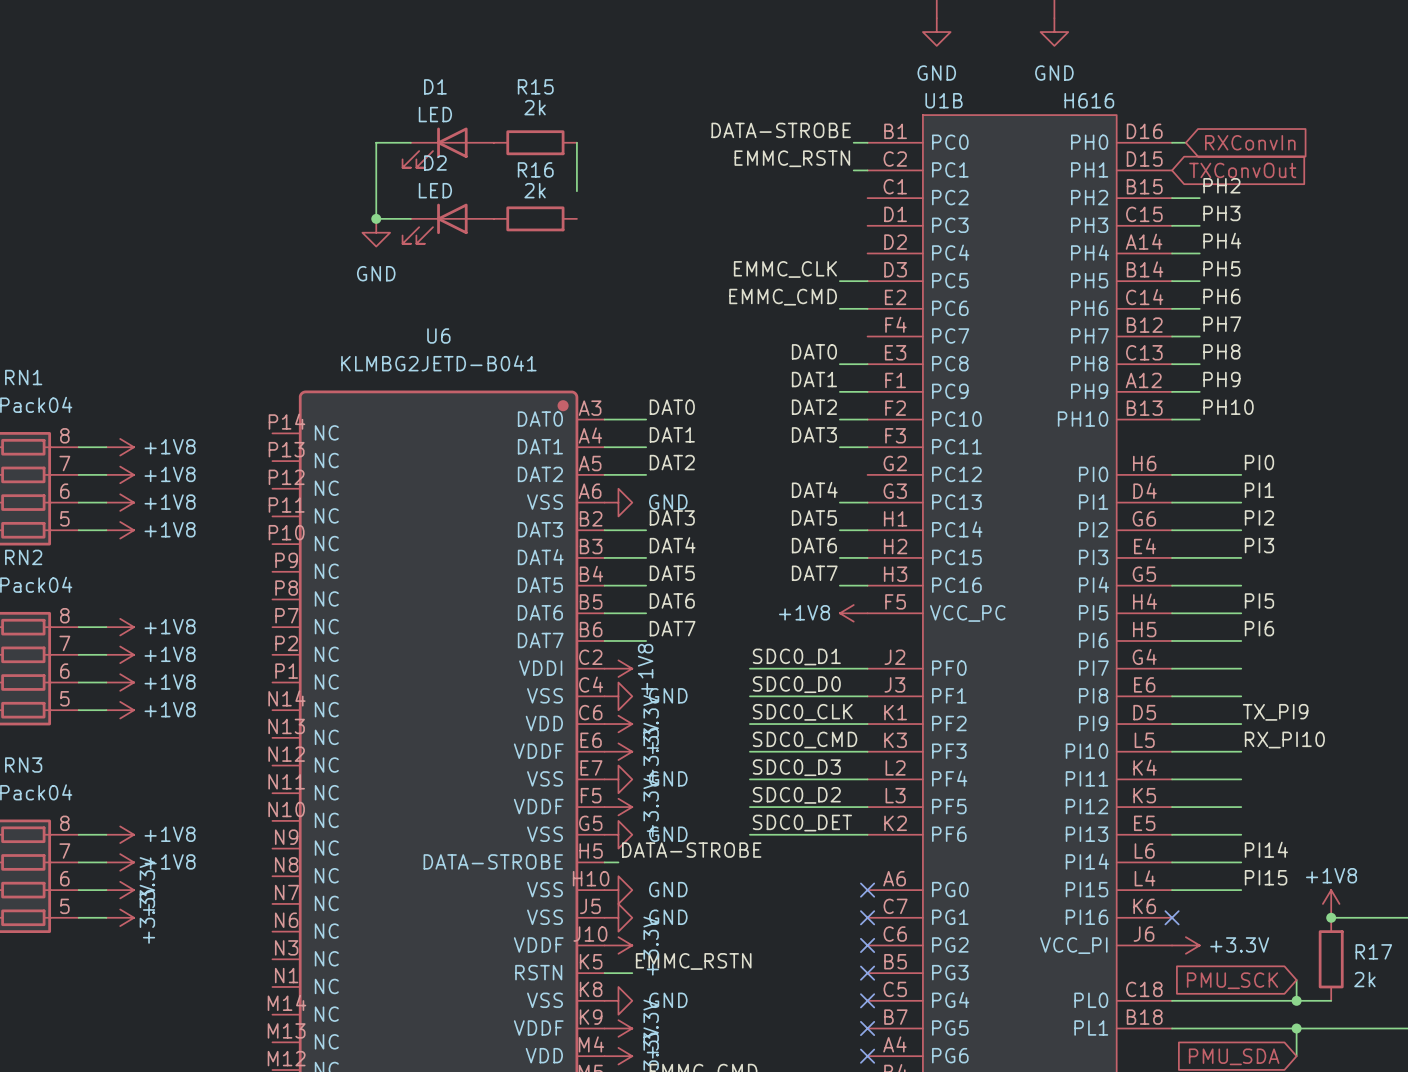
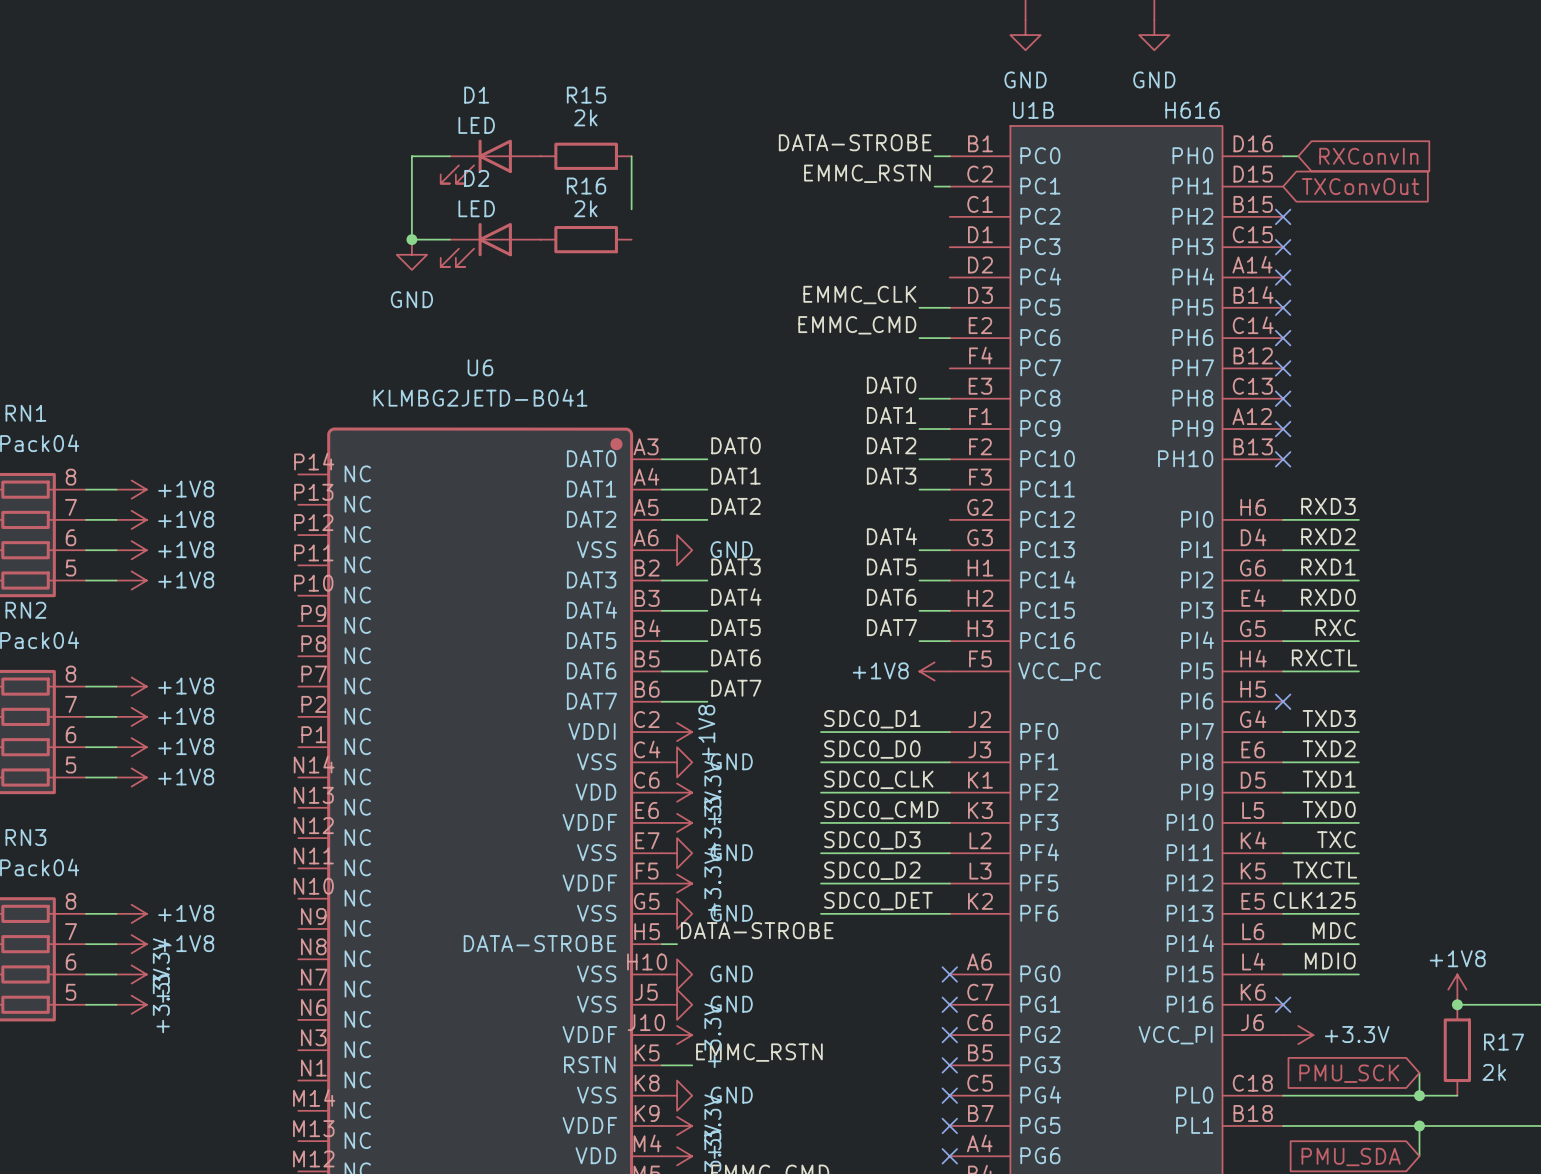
label: PH2 (1221, 185) -> none
wire: (1172, 198) (1199, 198) -> none
no-connect mark: none -> (1283, 216)
label: PH3 (1221, 213) -> none
wire: (1172, 225) (1199, 225) -> none
no-connect mark: none -> (1283, 247)
label: PH4 (1222, 240) -> none
wire: (1172, 253) (1199, 253) -> none
no-connect mark: none -> (1283, 277)
label: PH5 (1221, 268) -> none
wire: (1172, 281) (1199, 281) -> none
no-connect mark: none -> (1283, 307)
label: PH6 (1221, 296) -> none
wire: (1172, 308) (1199, 308) -> none
no-connect mark: none -> (1283, 338)
label: PH7 (1222, 324) -> none
wire: (1172, 336) (1199, 336) -> none
no-connect mark: none -> (1283, 368)
label: PH8 (1221, 351) -> none
wire: (1172, 364) (1199, 364) -> none
no-connect mark: none -> (1283, 398)
label: PH9 (1221, 379) -> none
wire: (1172, 391) (1199, 391) -> none
no-connect mark: none -> (1283, 429)
label: PH10 (1228, 407) -> none
wire: (1172, 419) (1199, 419) -> none
no-connect mark: none -> (1283, 459)
label: PI0 (1259, 462) -> RXD3 (1328, 506)
label: PI1 (1259, 490) -> RXD2 (1328, 536)
label: PI2 (1259, 517) -> RXD1 (1328, 567)
label: PI3 (1259, 545) -> RXD0 (1328, 597)
label: none -> RXC (1335, 627)
label: PI5 (1259, 600) -> RXCTL (1324, 657)
label: PI6 (1259, 628) -> none
wire: (1172, 640) (1241, 640) -> none
no-connect mark: none -> (1283, 701)
label: none -> TXD3 (1329, 718)
label: none -> TXD2 (1329, 748)
label: TX_PI9 (1275, 712) -> TXD1 (1329, 779)
label: RX_PI10 (1284, 740) -> TXD0 (1329, 809)
label: none -> TXC (1336, 839)
label: none -> TXCTL (1325, 870)
label: none -> CLK125 (1314, 900)
label: PI14 (1266, 849) -> MDC (1334, 930)
label: PI15 (1266, 877) -> MDIO (1330, 960)

